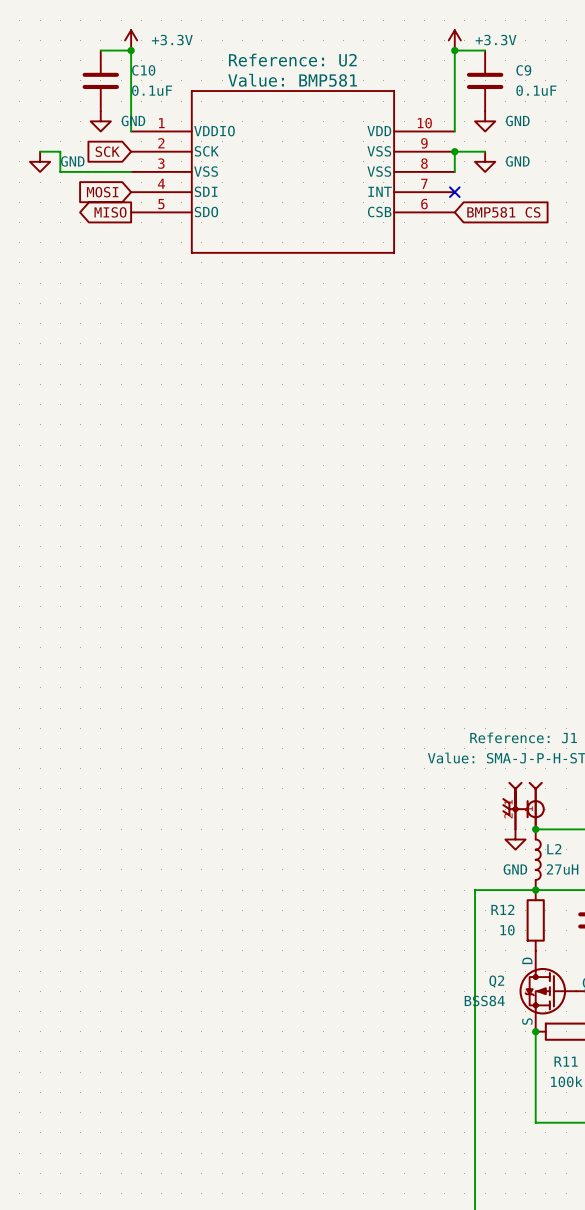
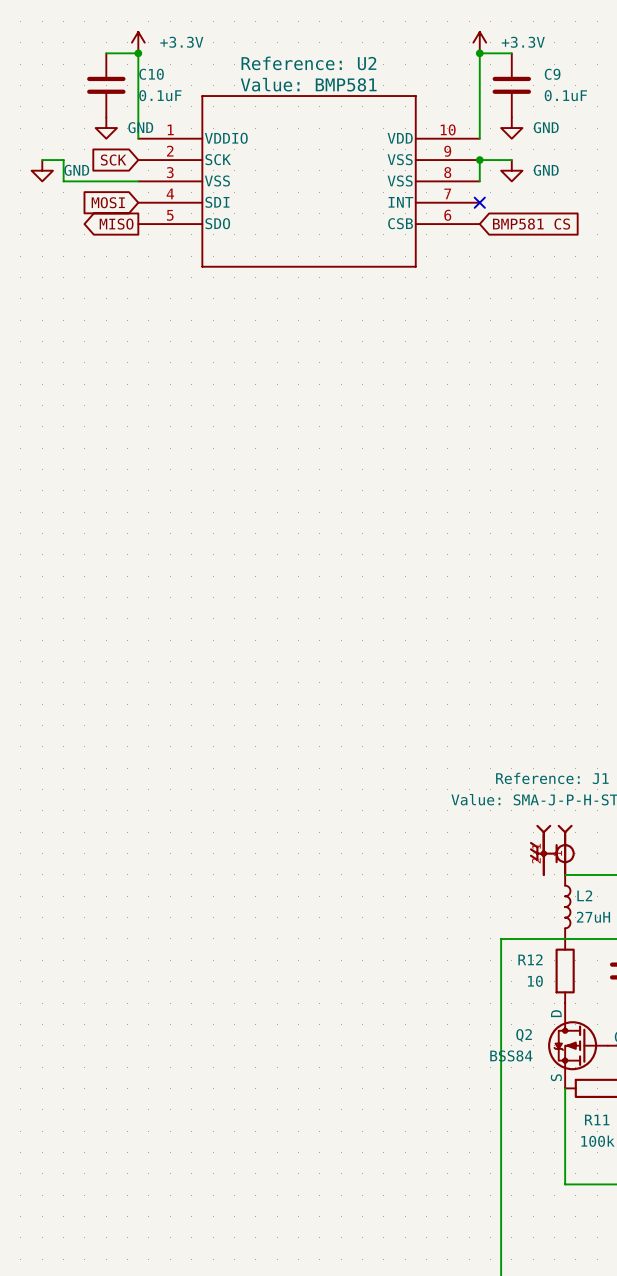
junction: (535, 829) -> none
power symbol: GND (515, 839) -> none
junction: (535, 890) -> none
junction: (535, 1031) -> none

